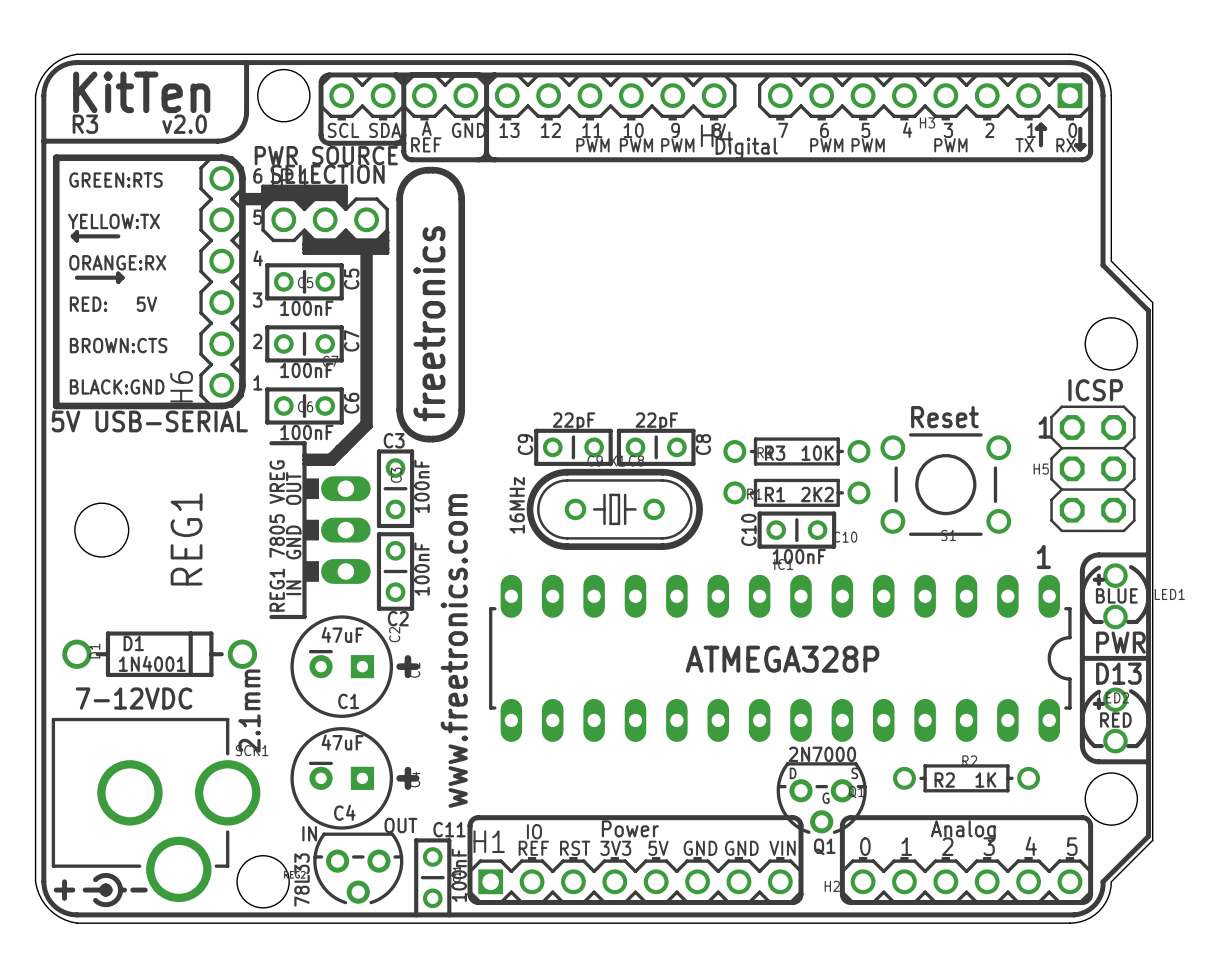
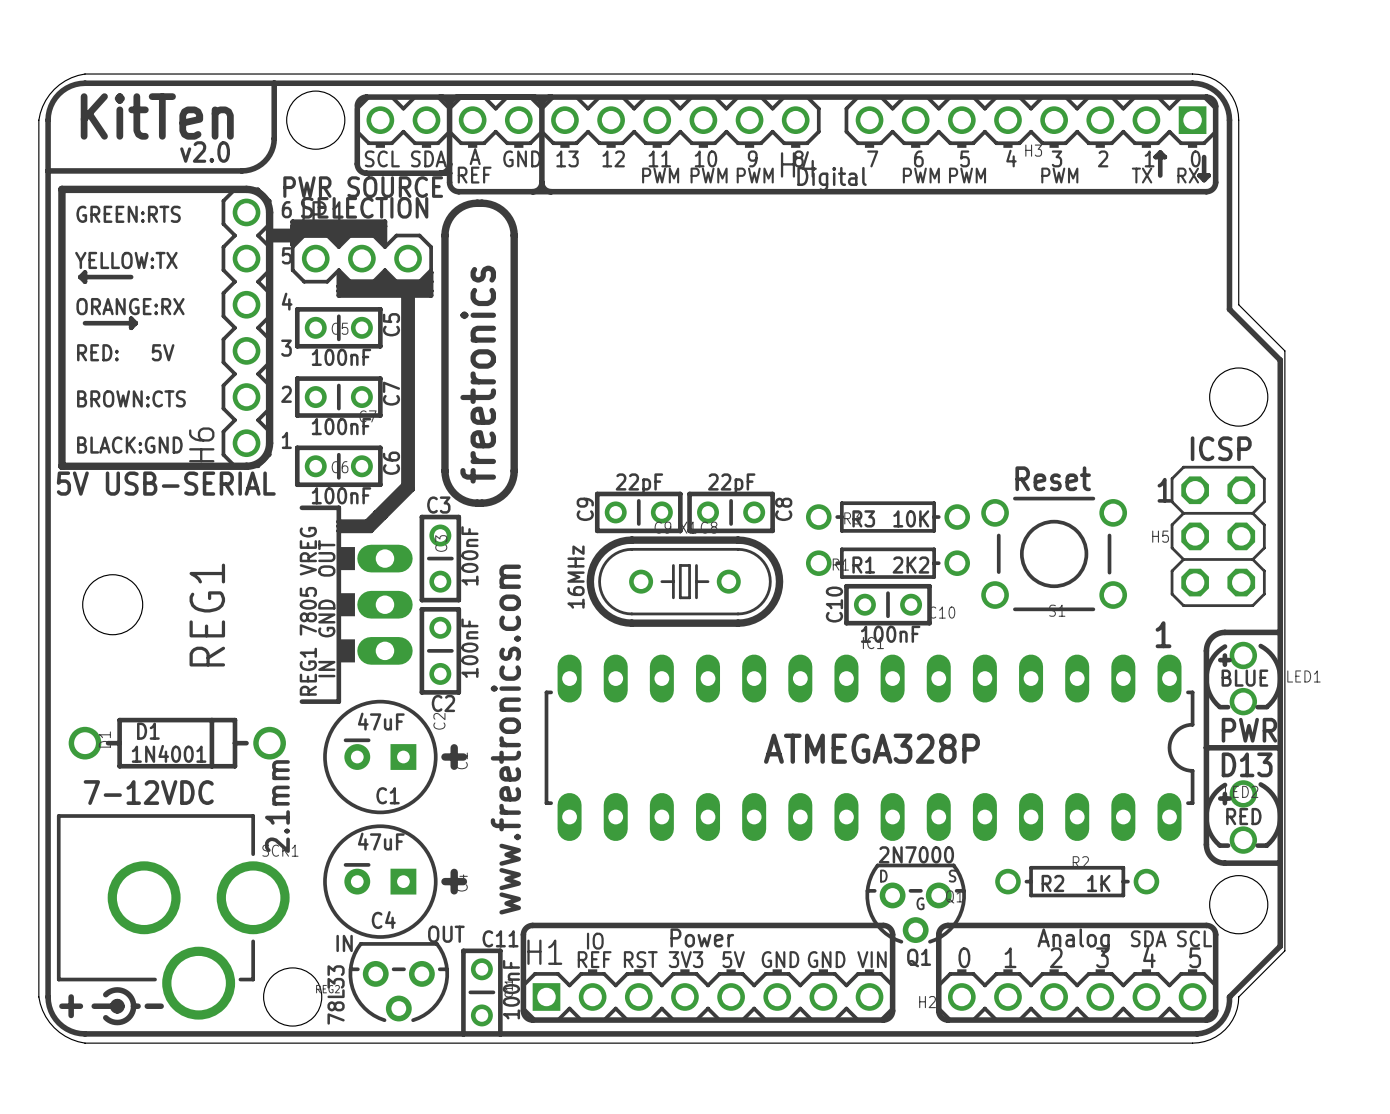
text: R3 (85, 124) -> none
text: none -> SDA (1148, 938)
text: none -> SCL (1194, 938)

